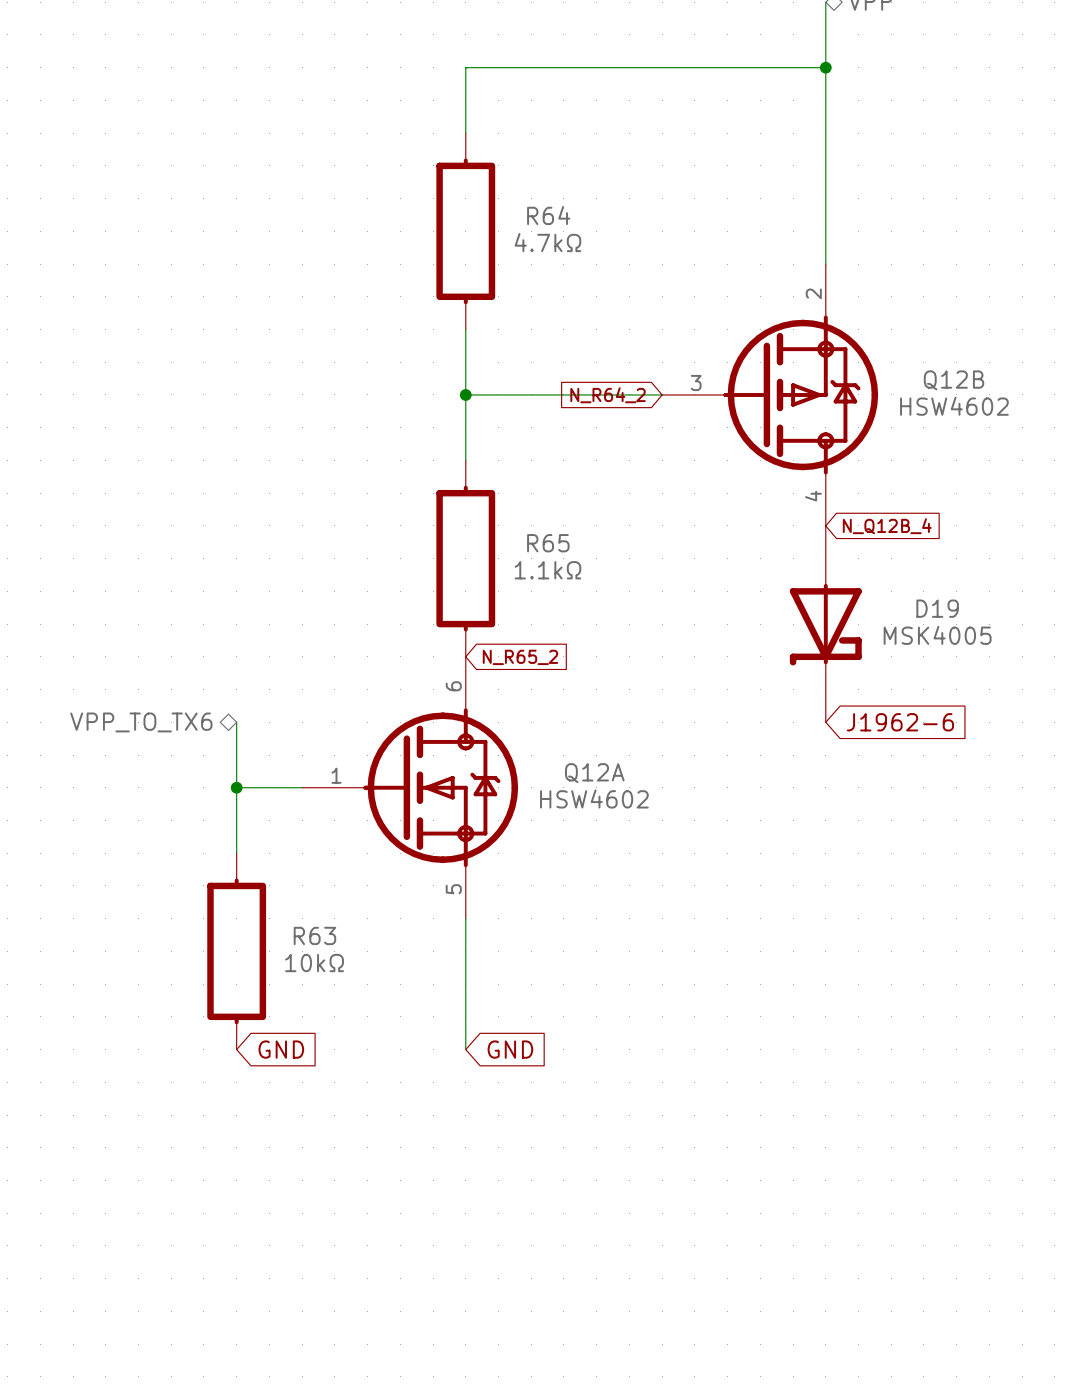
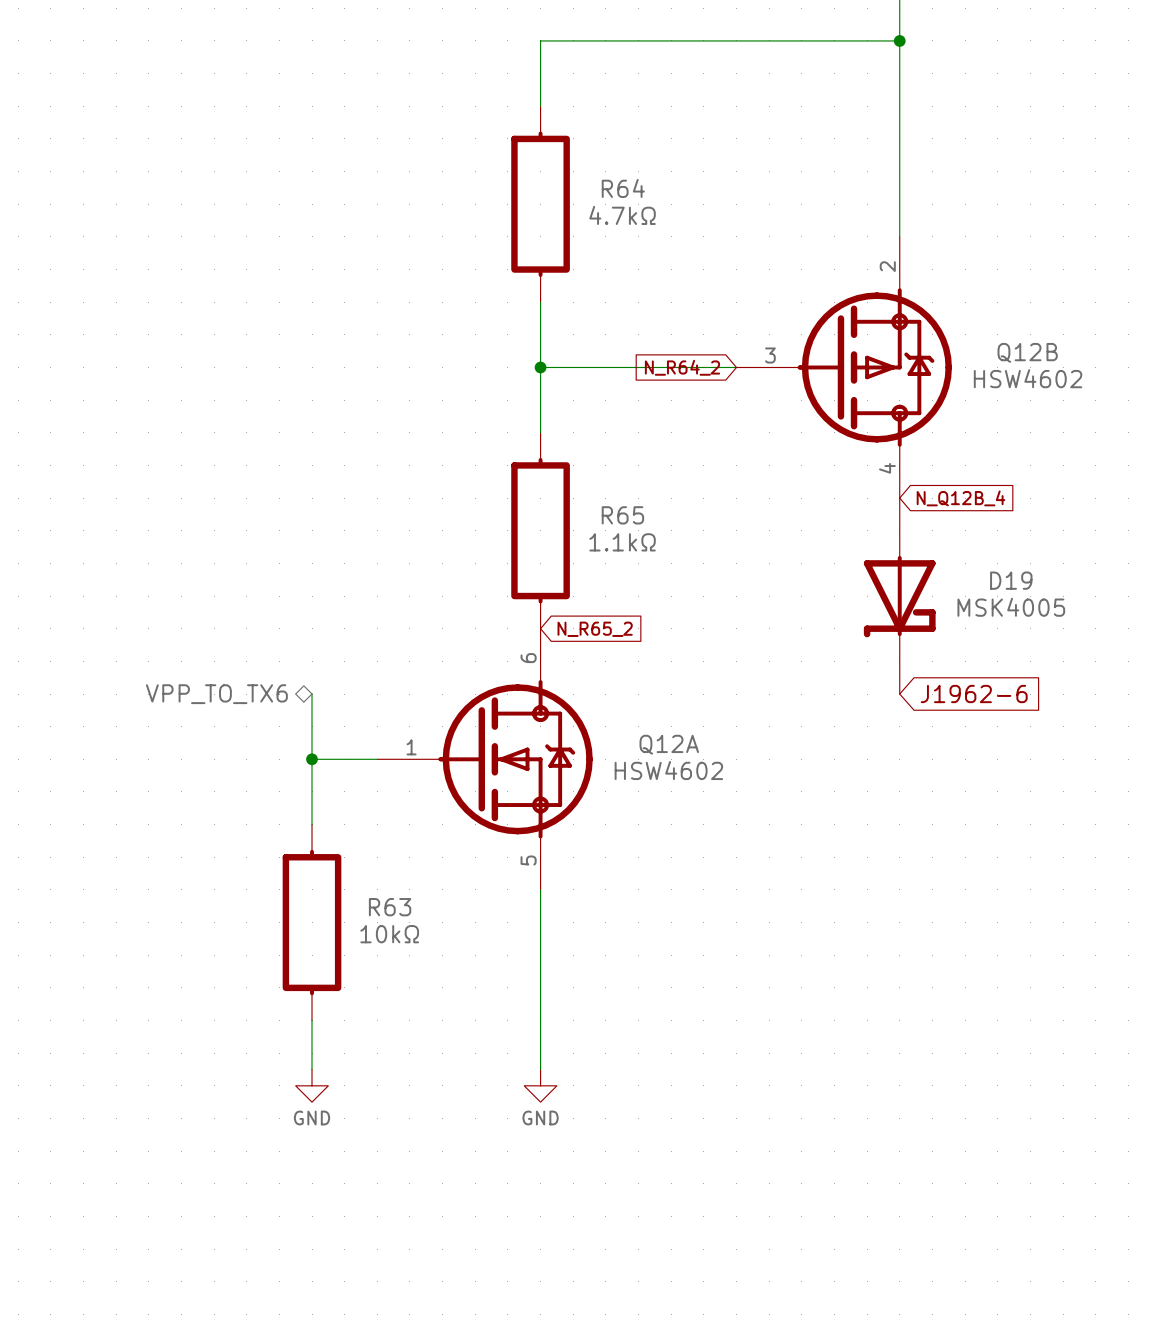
wire: none -> (312, 1020) (312, 1069)
global label: GND (281, 1049) -> none
wire: none -> (540, 1020) (540, 1069)
global label: GND (510, 1049) -> none
power symbol: none -> GND (312, 1085)
power symbol: none -> GND (540, 1085)

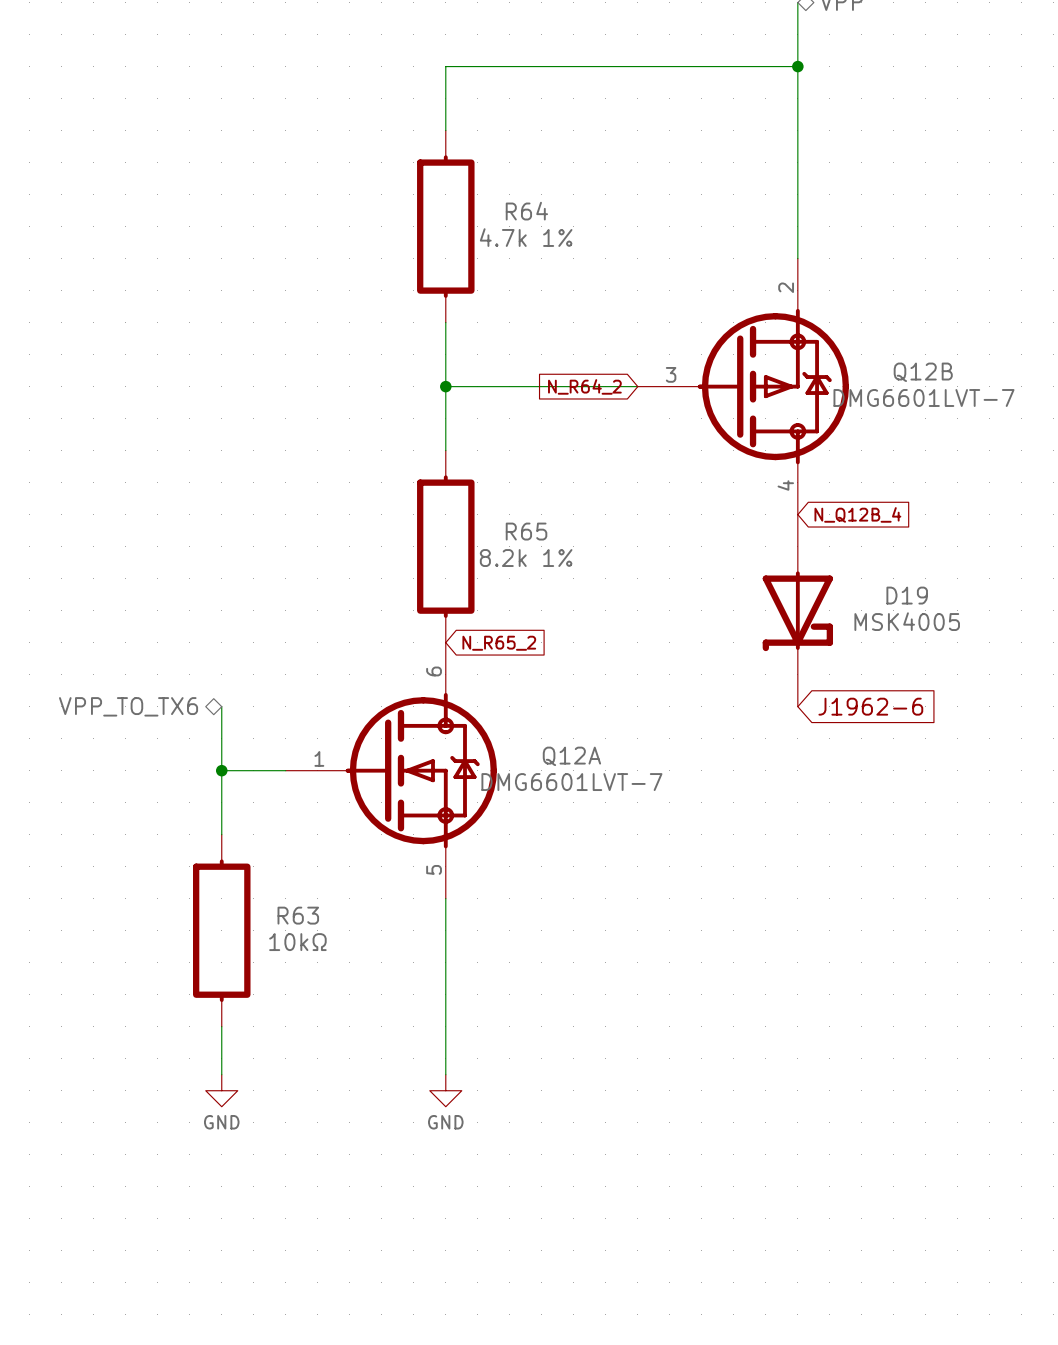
R64 value: 4.7kΩ (622, 215) -> 4.7k 1% (526, 237)
Q12B value: HSW4602 (1028, 378) -> DMG6601LVT-7 (923, 397)
R65 value: 1.1kΩ (622, 542) -> 8.2k 1% (526, 558)
Q12A value: HSW4602 (668, 770) -> DMG6601LVT-7 (571, 782)

